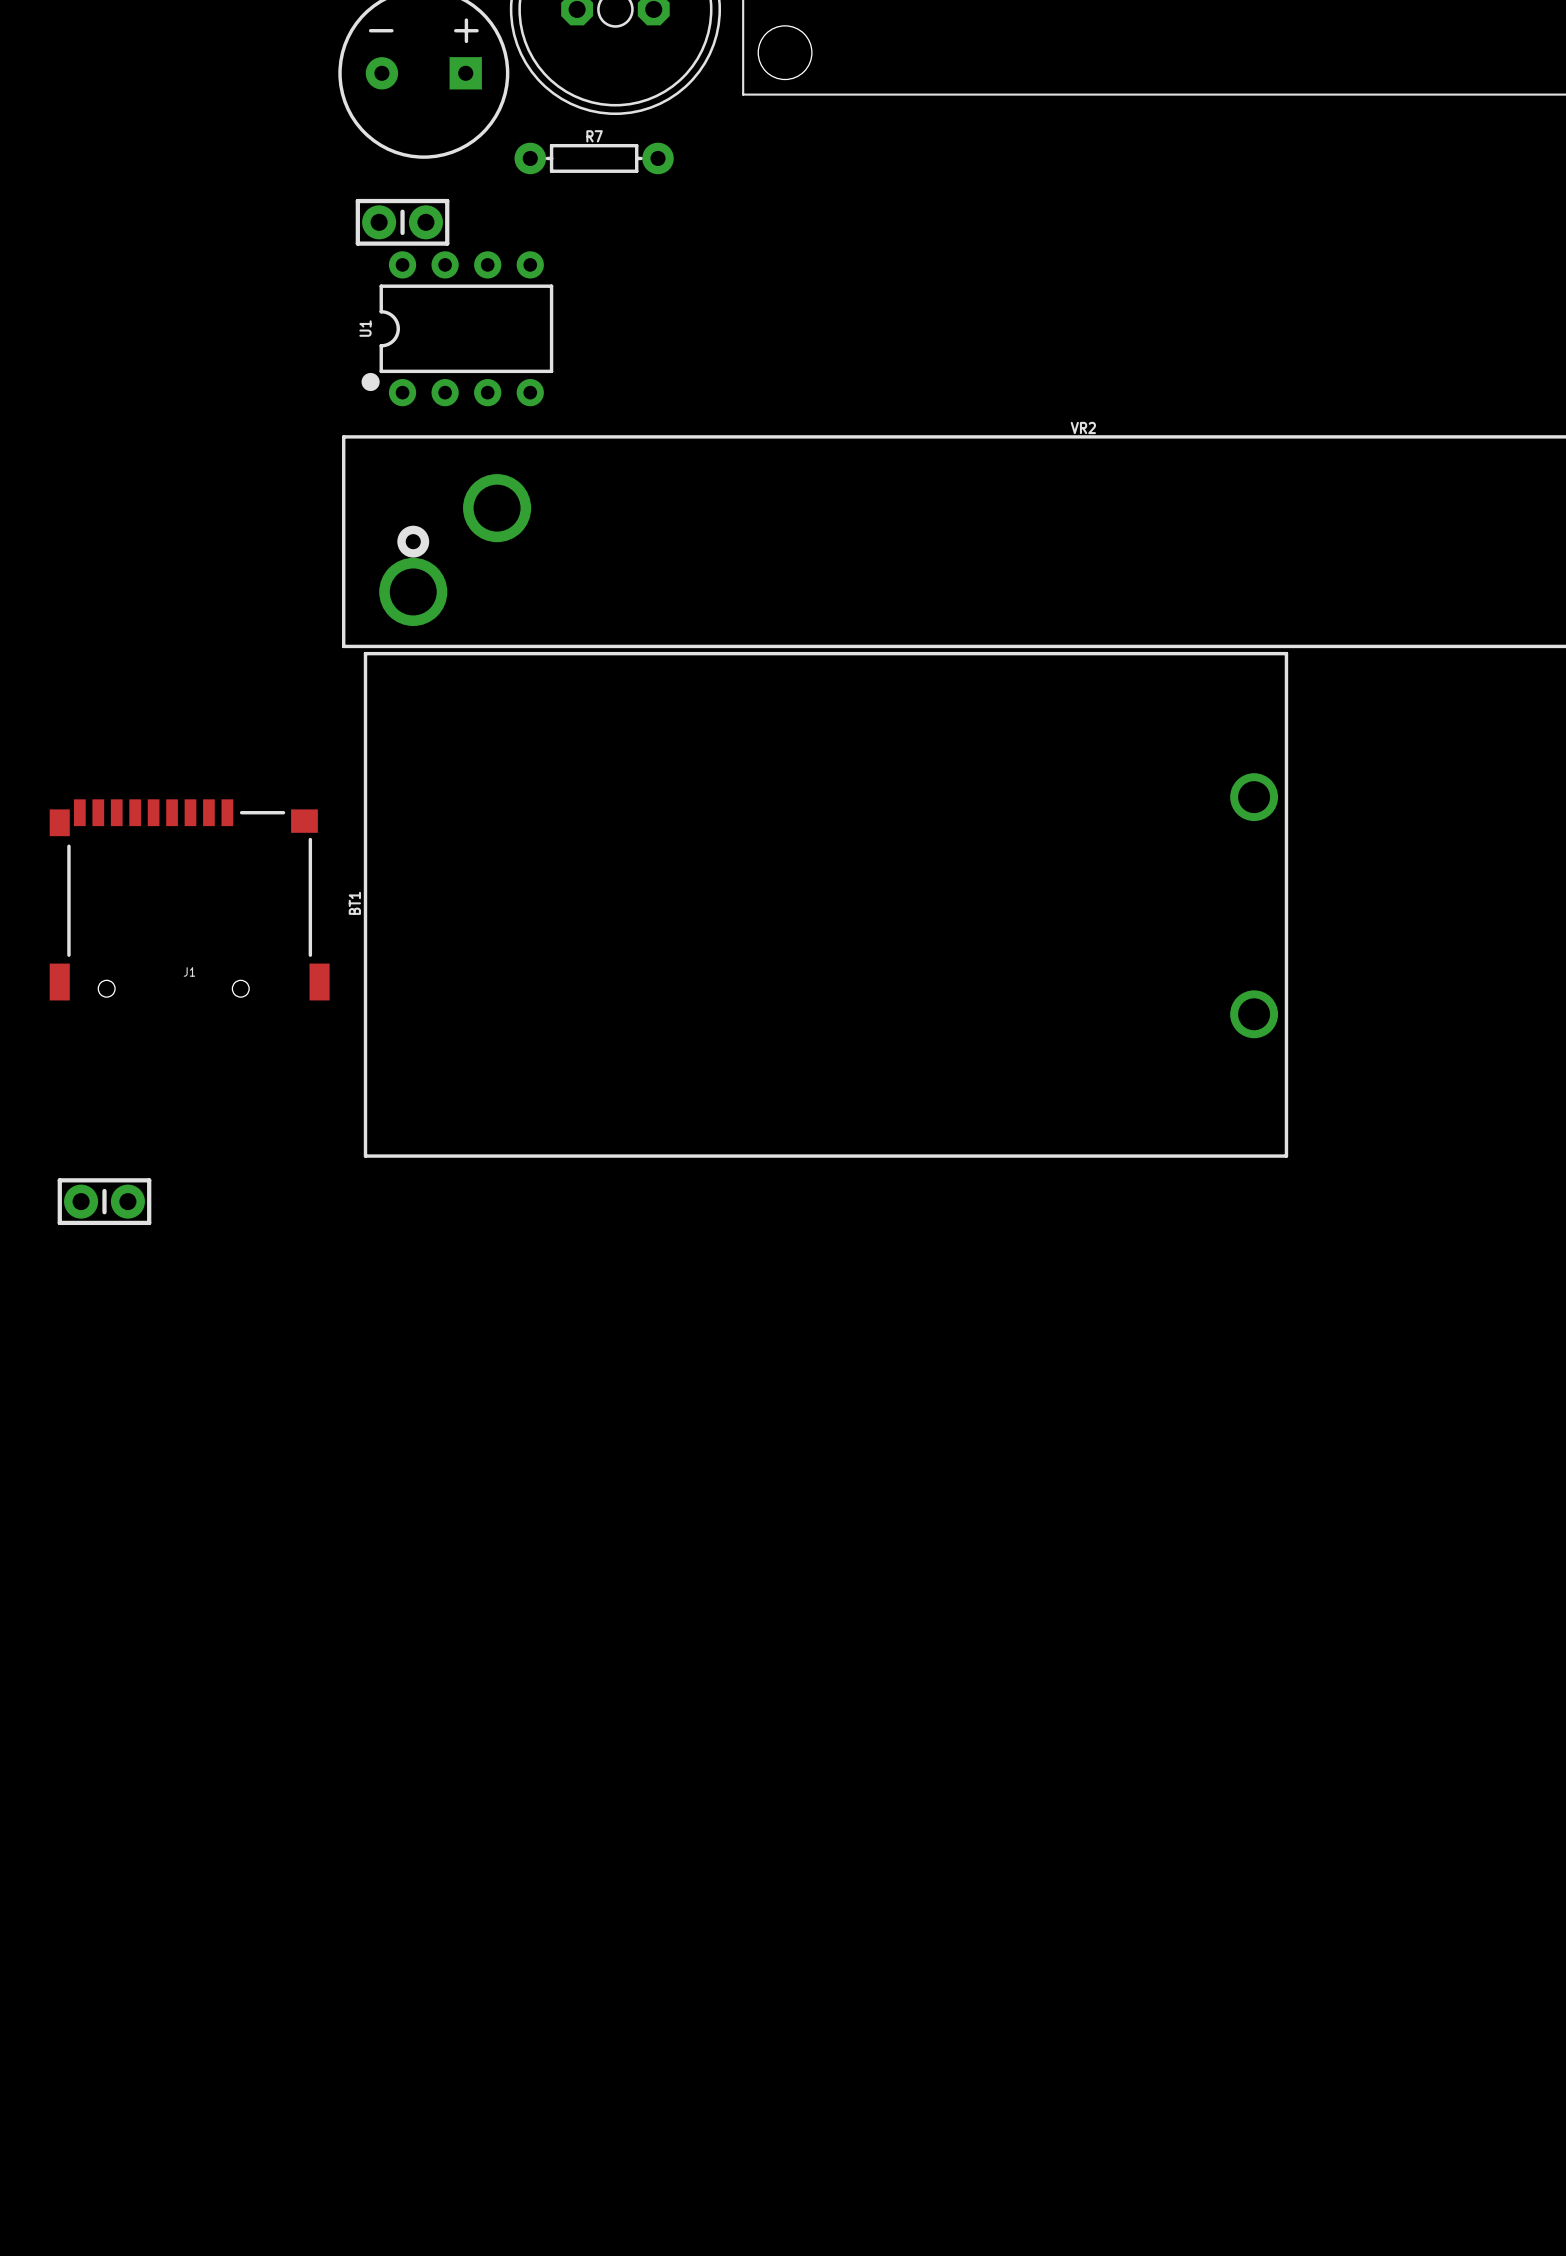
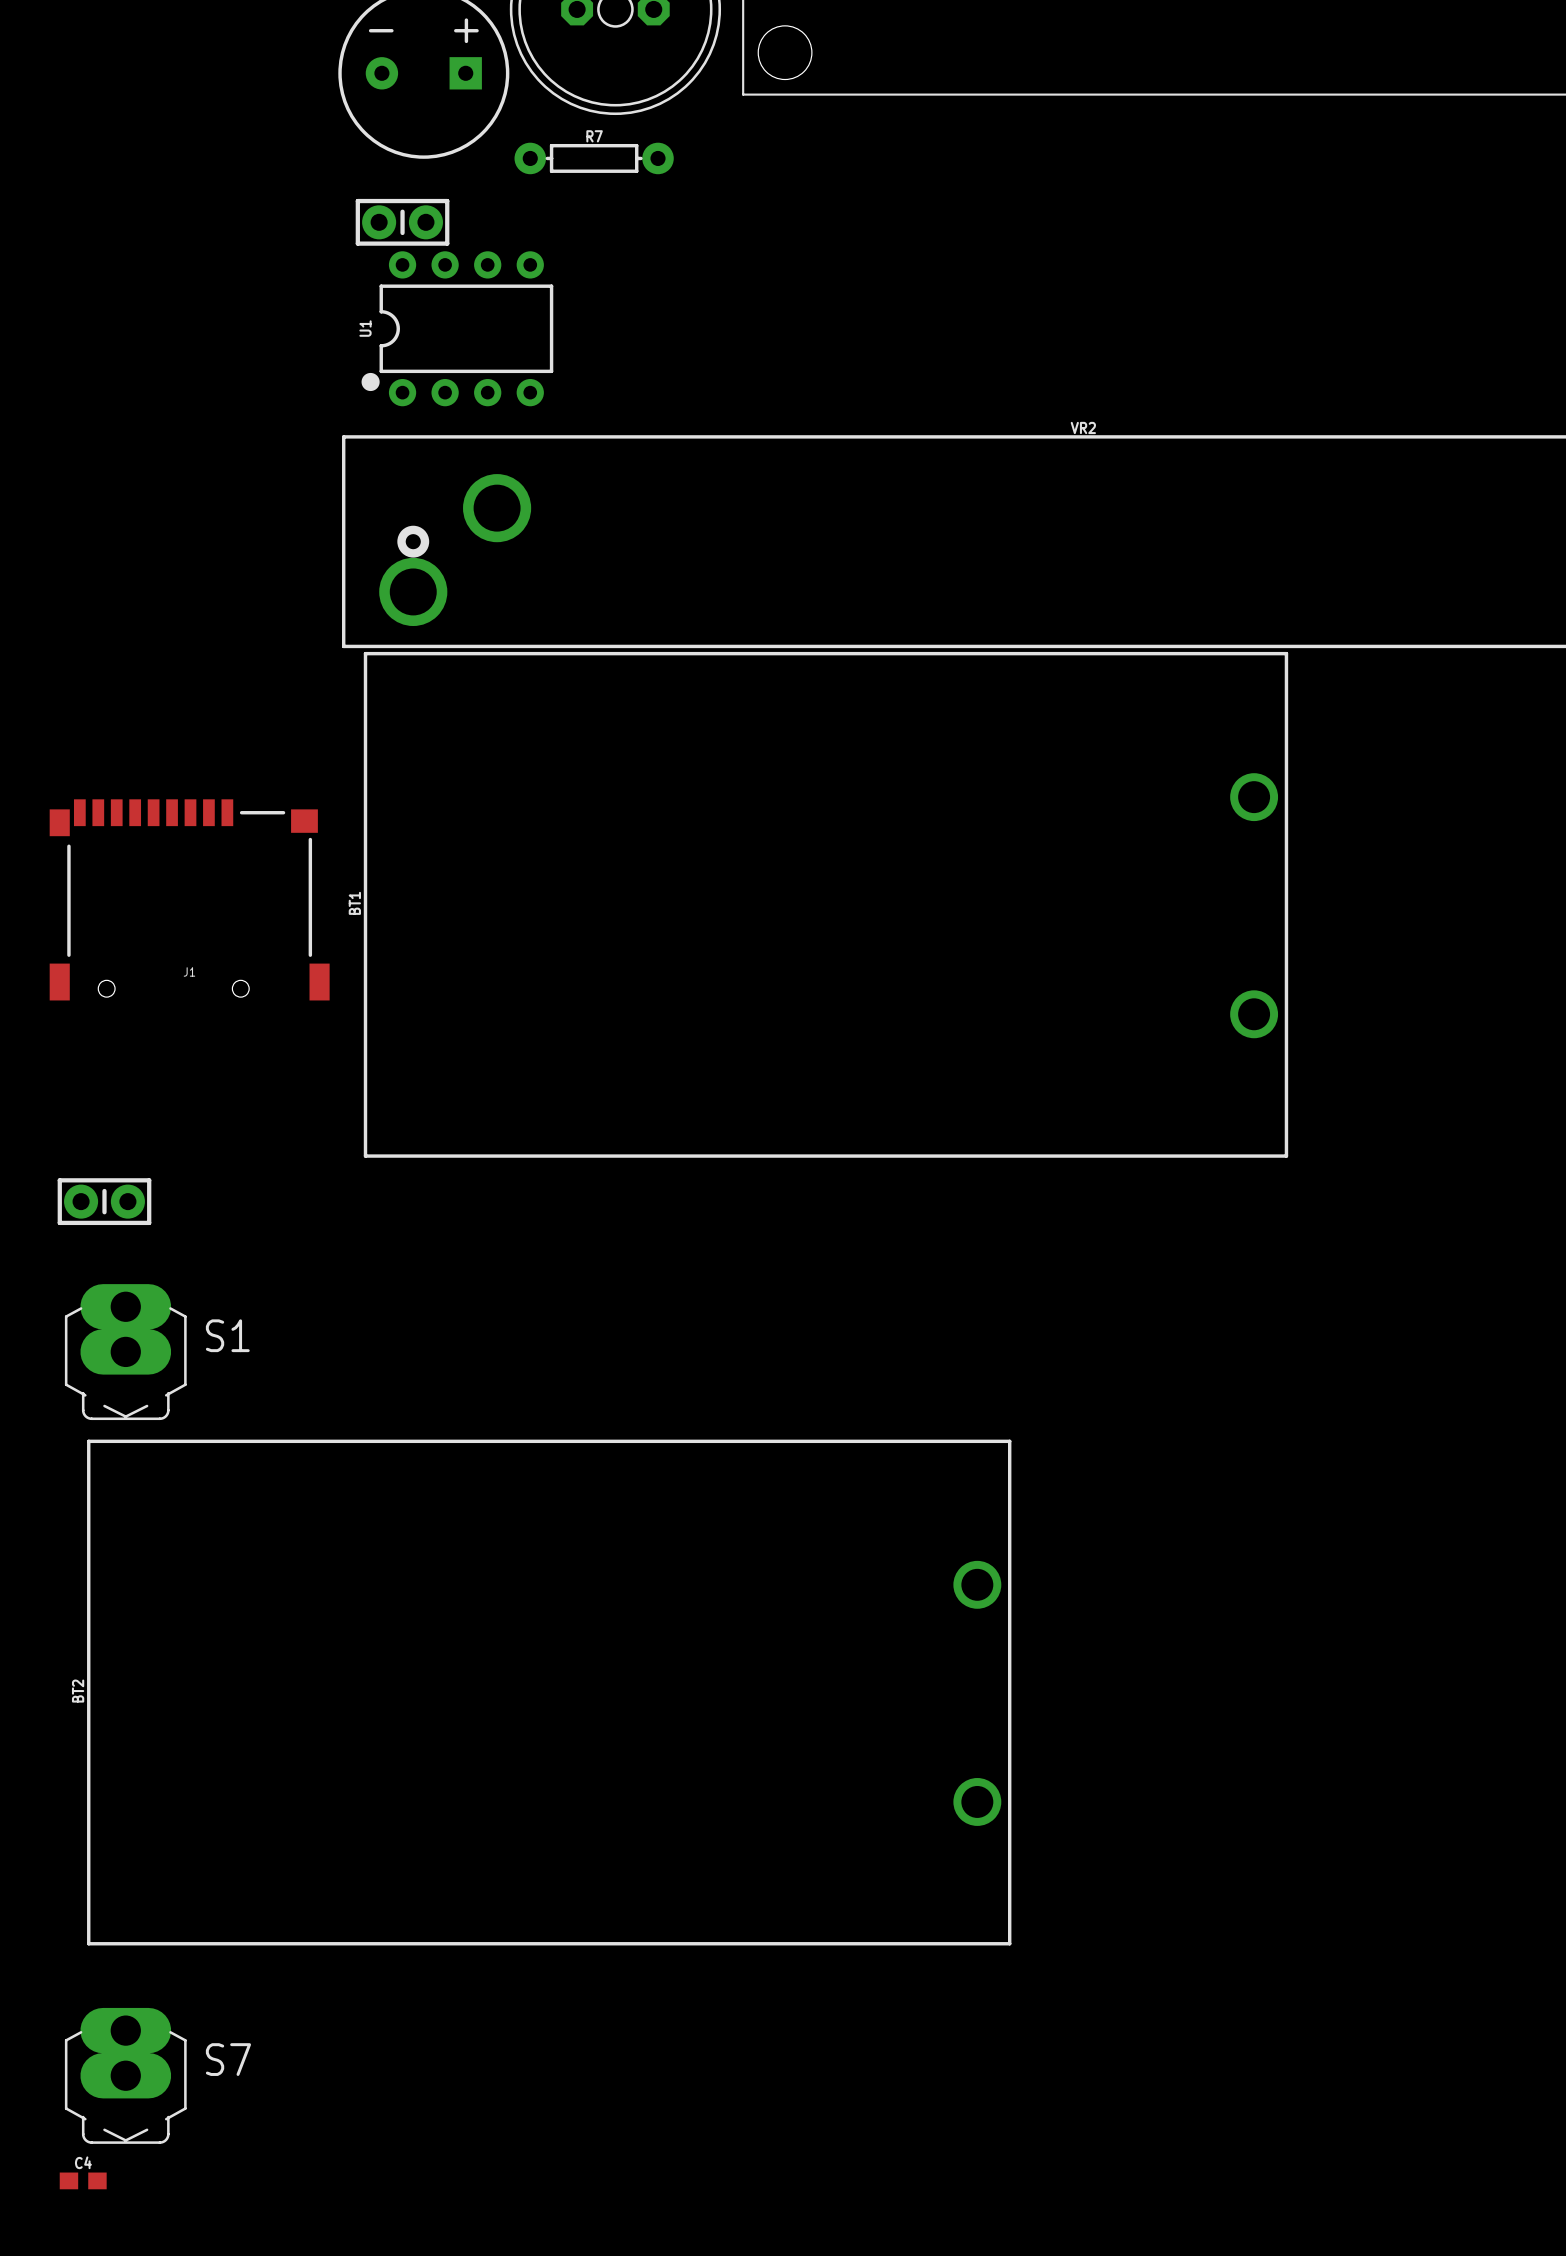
S1: none -> (125, 1352)
BT2: none -> (549, 1692)
S7: none -> (125, 2075)
C4: none -> (83, 2180)

